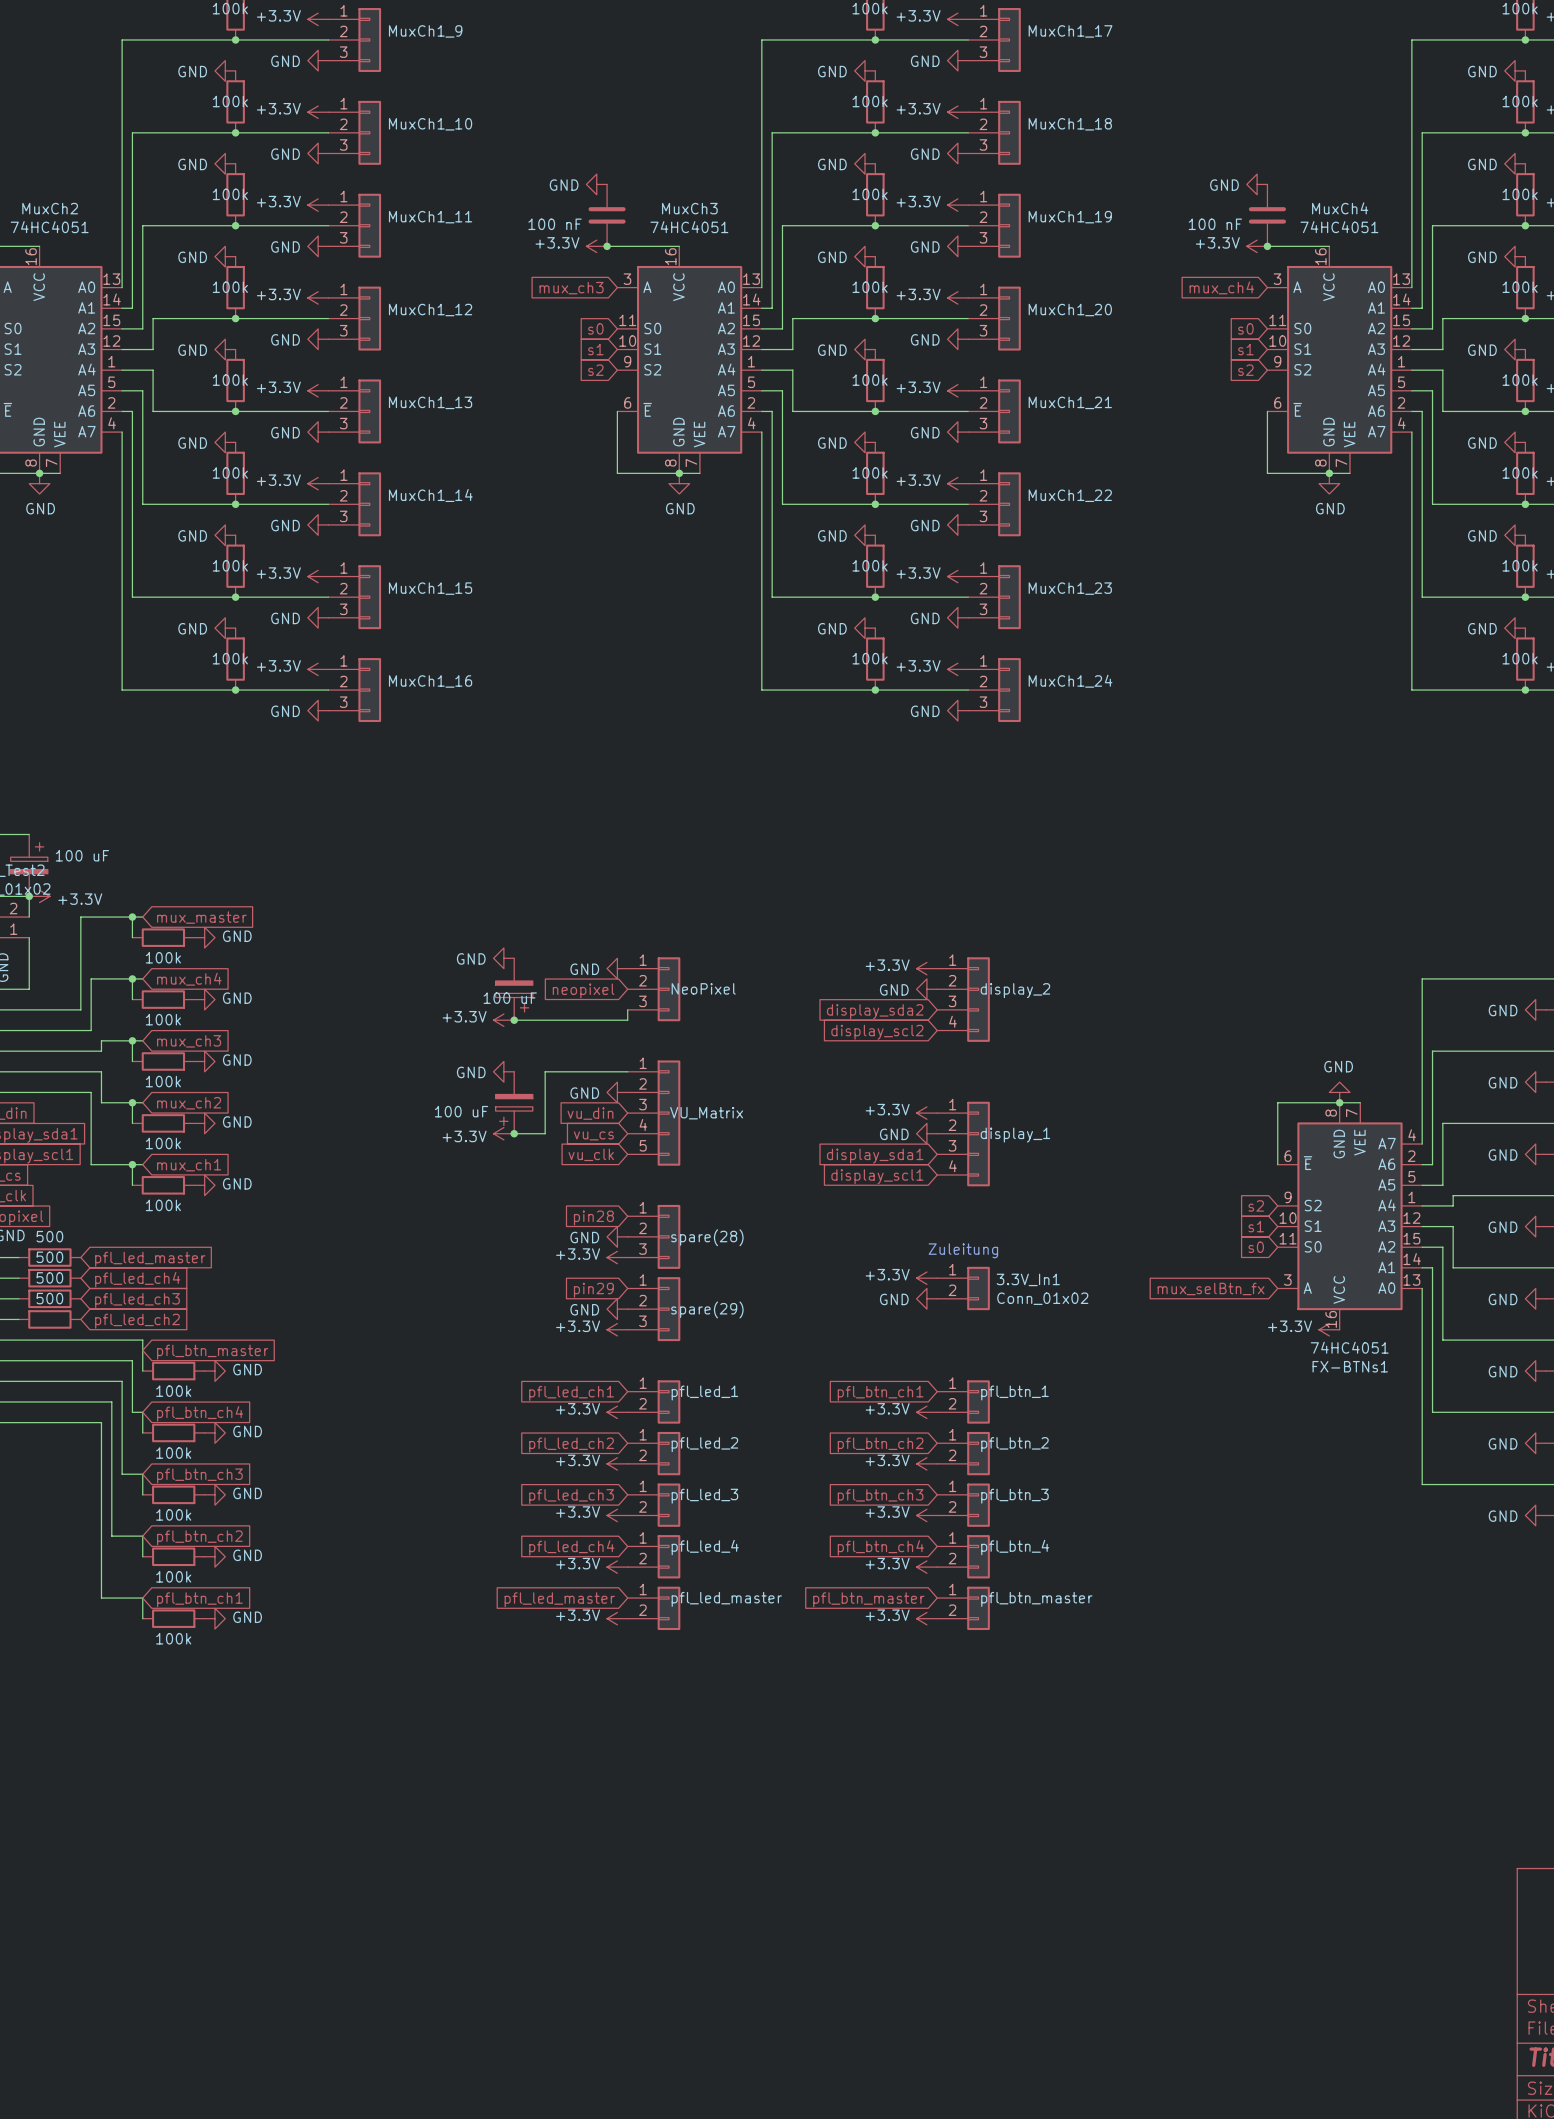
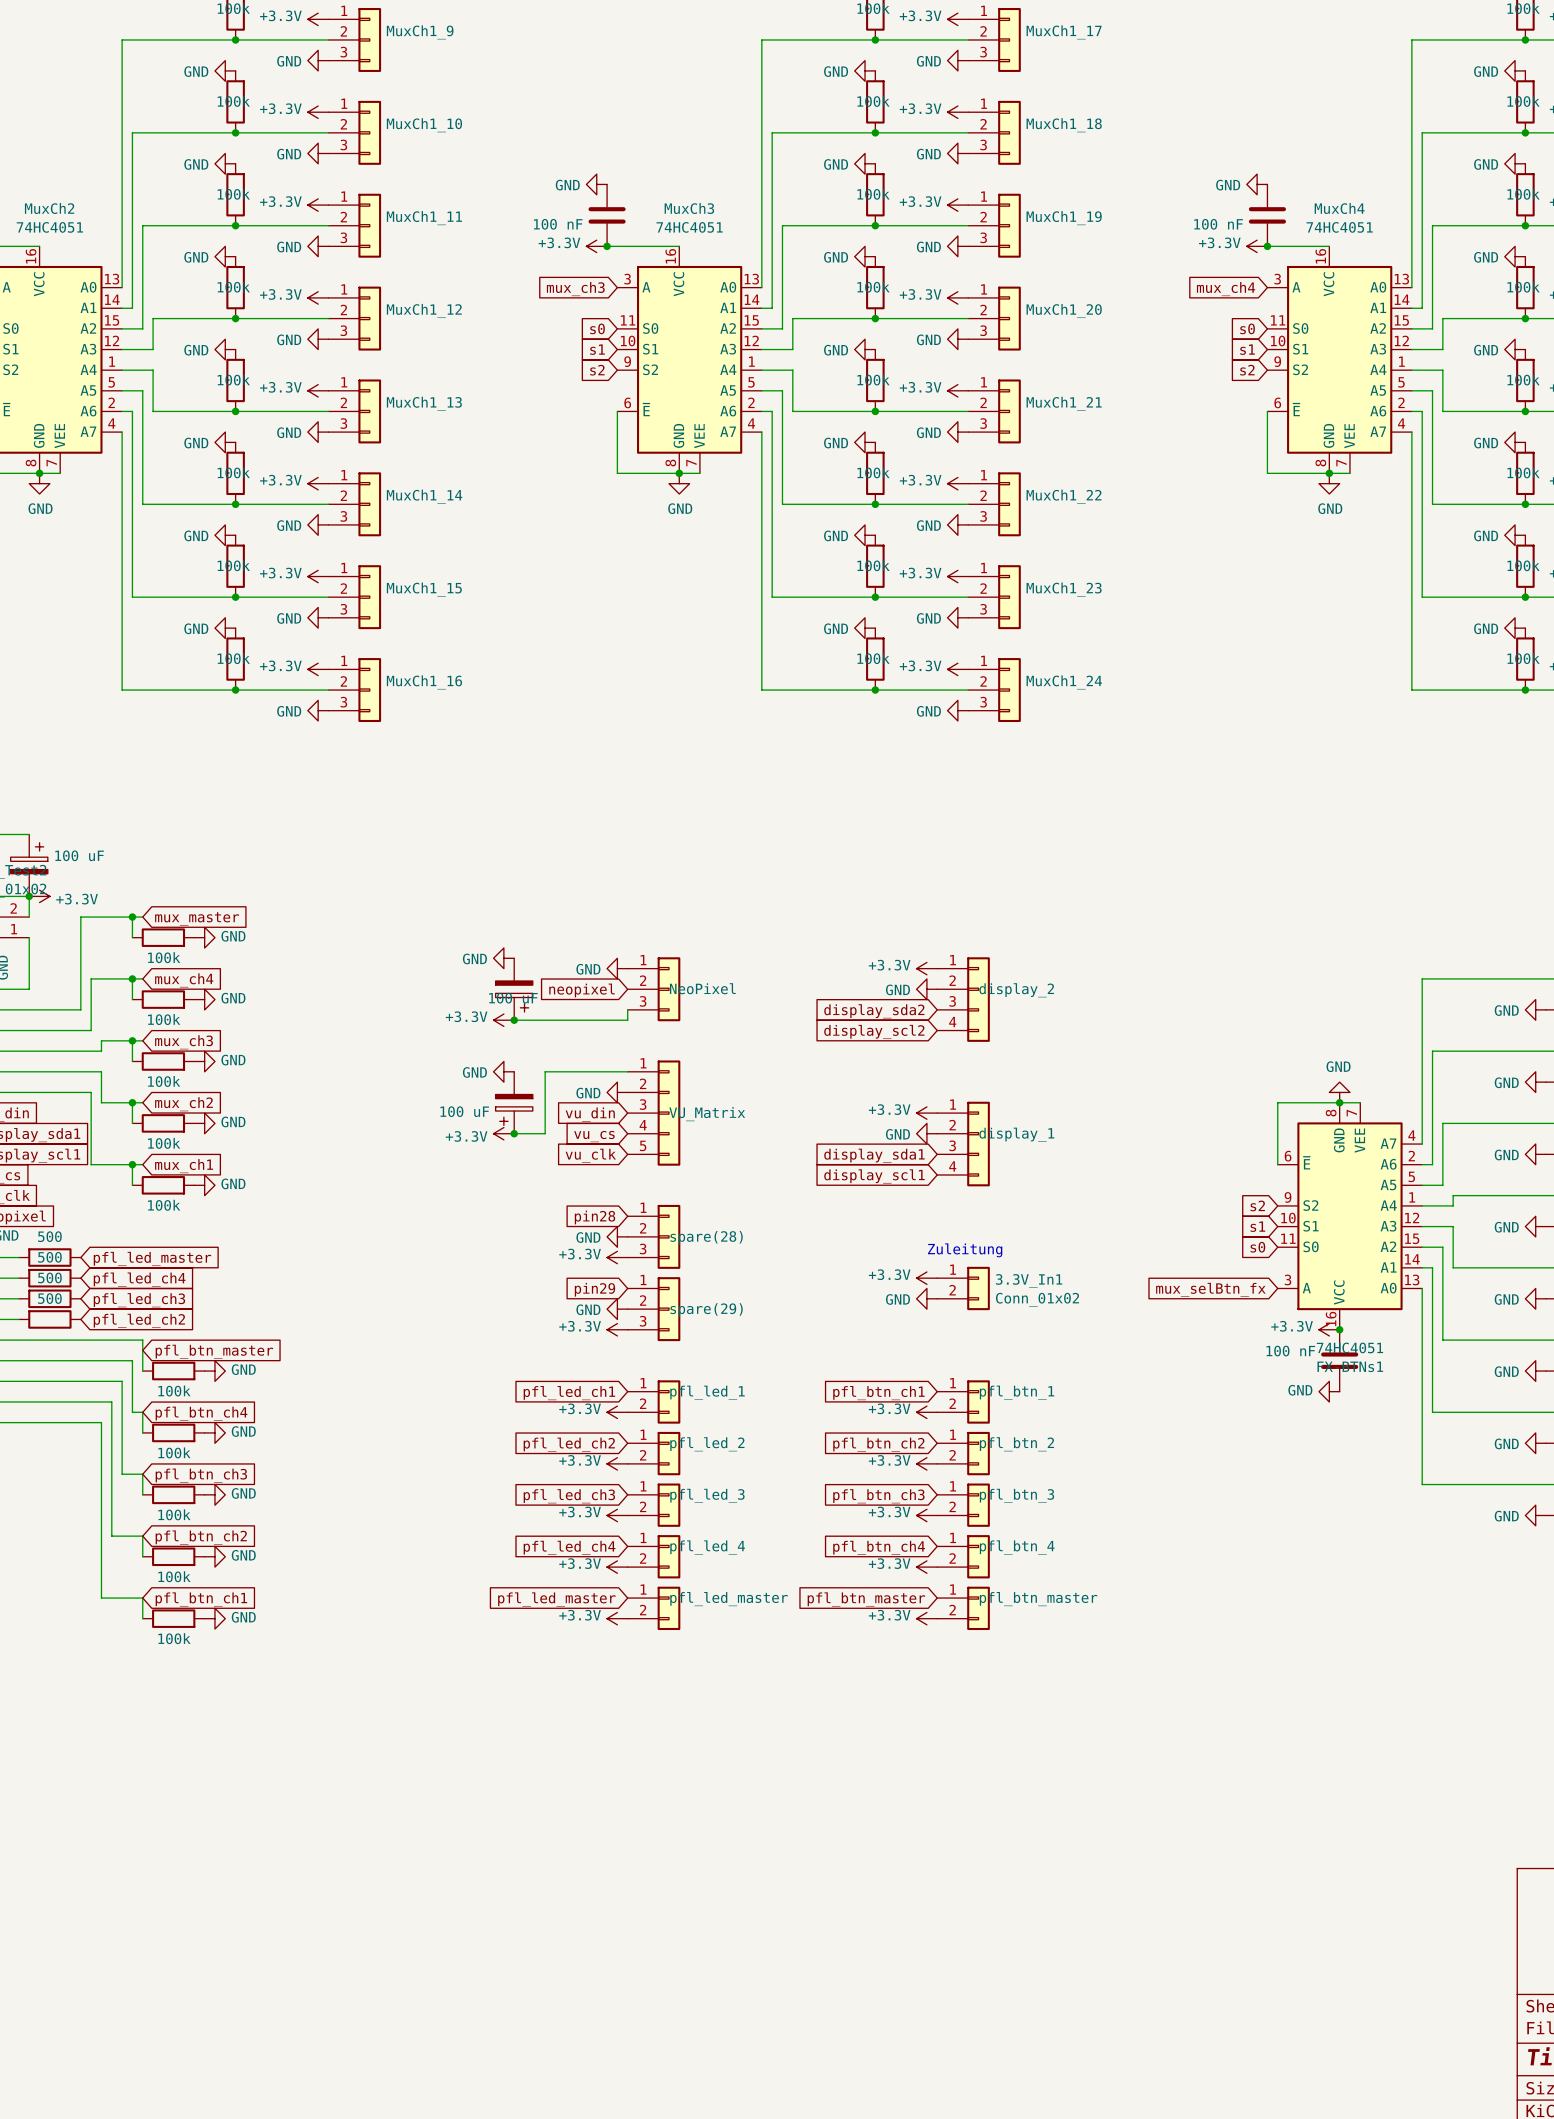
junction: none -> (1339, 1329)
part: none -> 100 nF (1339, 1360)
power symbol: none -> GND (1329, 1391)

